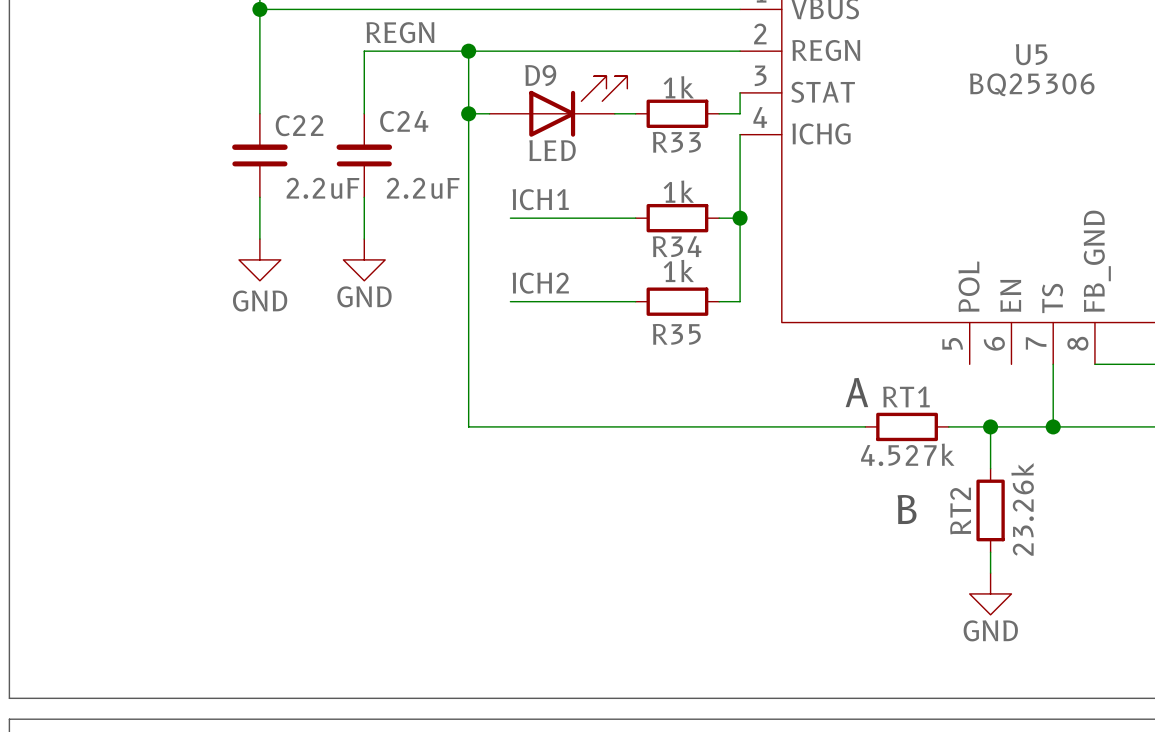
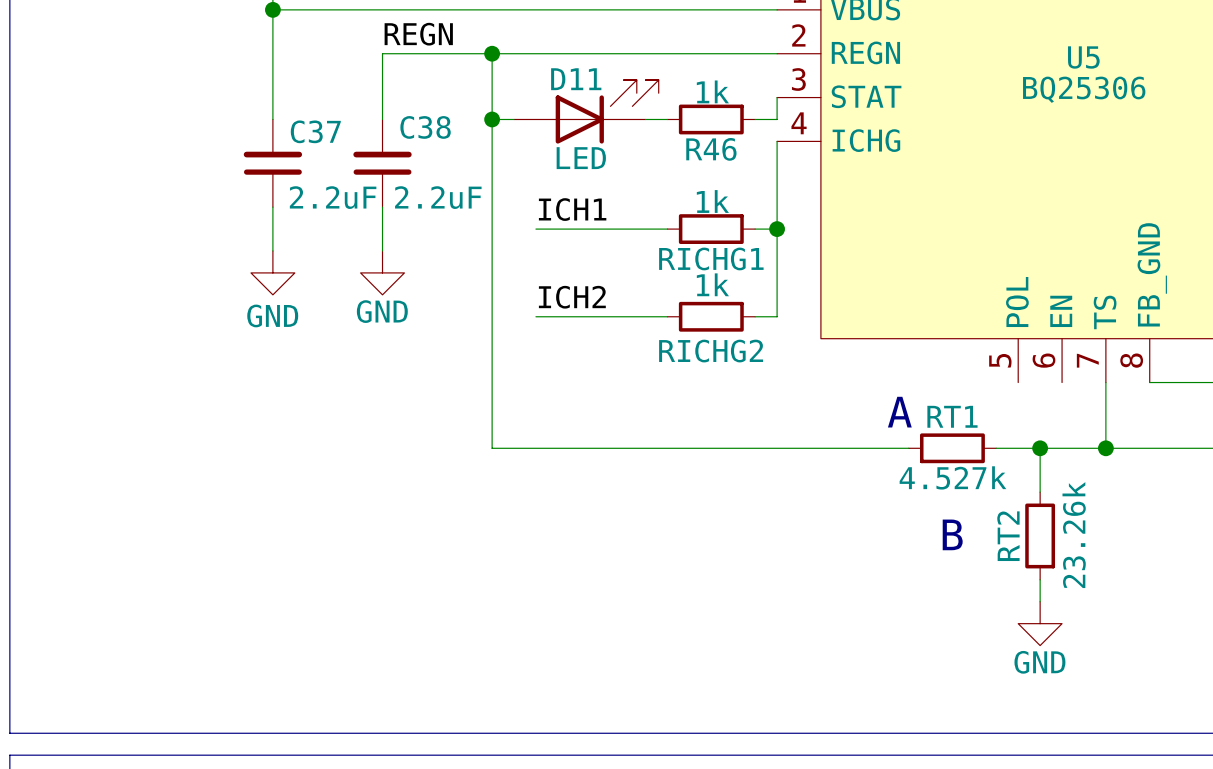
D9 name: D9 (540, 75) -> D11 (576, 79)
C24 name: C24 (404, 121) -> C38 (425, 127)
C22 name: C22 (299, 125) -> C37 (315, 131)
R33 name: R33 (676, 142) -> R46 (711, 149)
R34 name: R34 (677, 246) -> RICHG1 (711, 258)
R35 name: R35 (676, 334) -> RICHG2 (711, 351)

